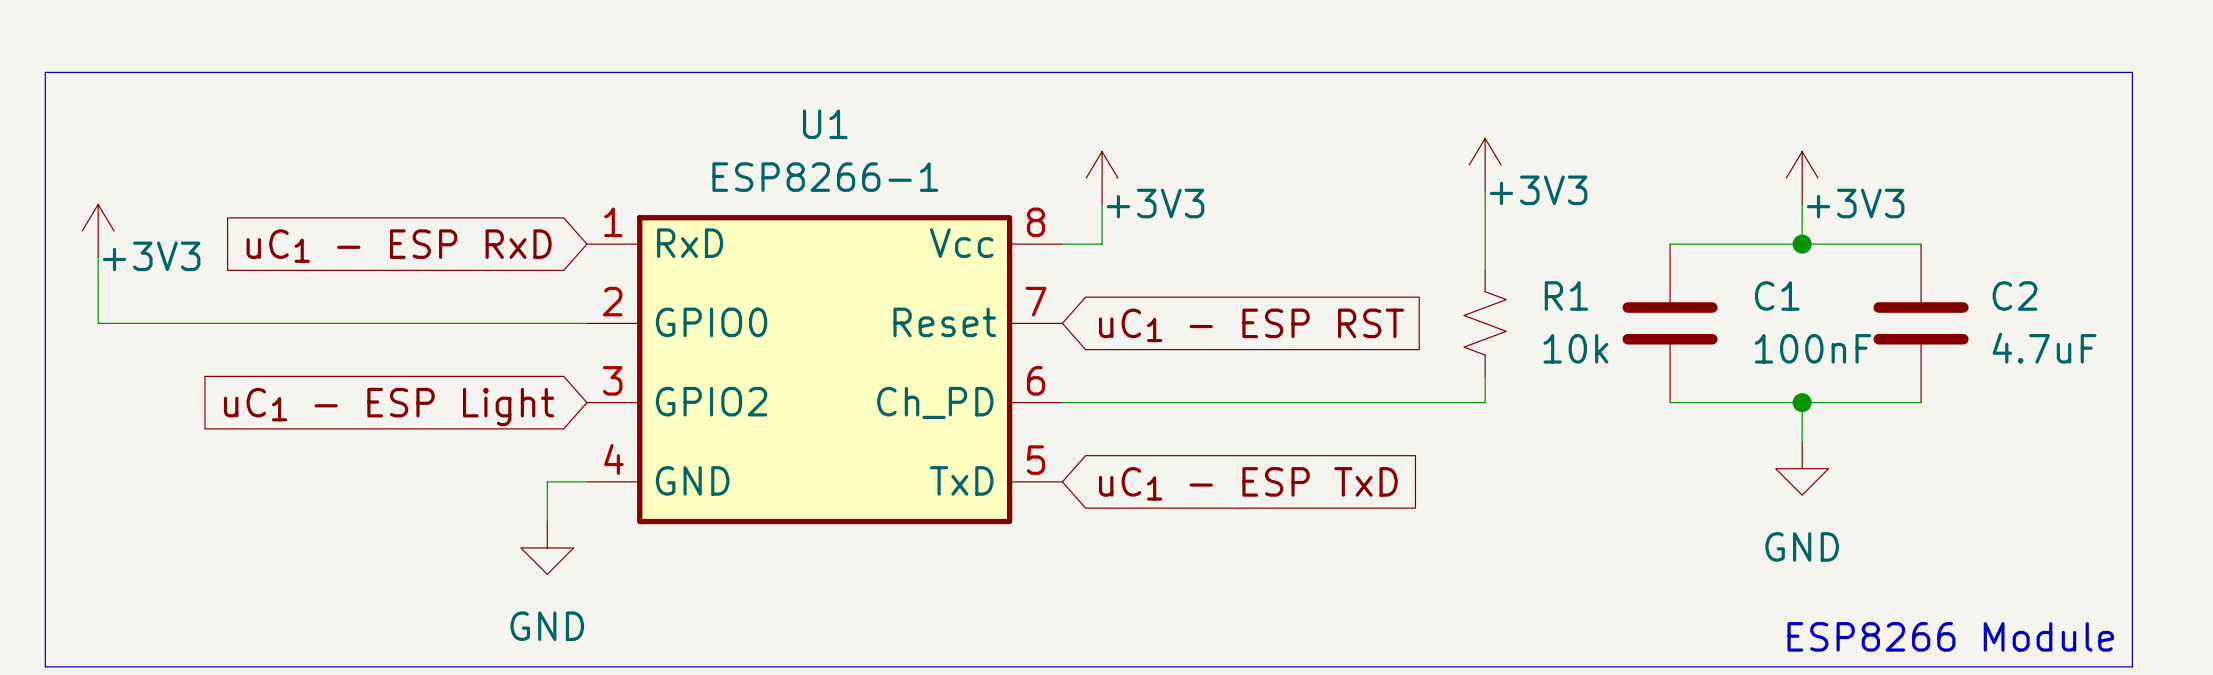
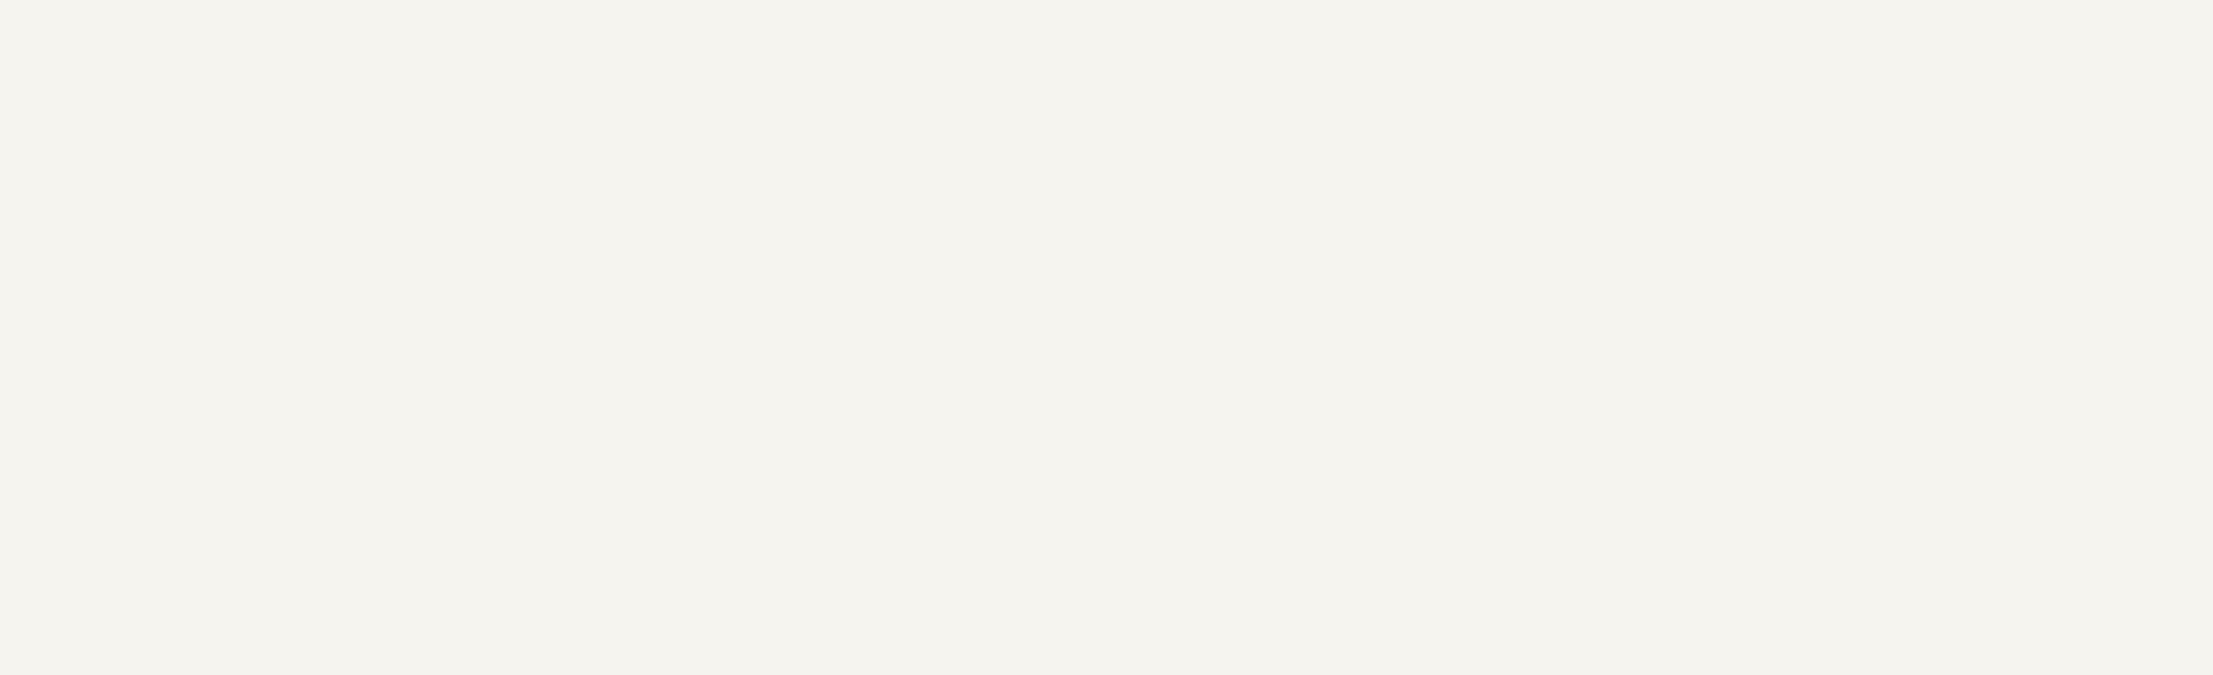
line: (45, 72) (2132, 72) (2132, 666) (45, 666) (45, 72) -> none
power symbol: +3V3 (1485, 164) -> none
power symbol: +3V3 (1102, 178) -> none
power symbol: +3V3 (1802, 178) -> none
wire: (1485, 191) (1485, 270) -> none
wire: (1102, 204) (1102, 244) (1062, 244) -> none
wire: (1802, 204) (1802, 244) -> none
power symbol: +3V3 (98, 230) -> none
wire: (1670, 244) (1921, 244) -> none
junction: (1802, 244) -> none
global label: uC1 - ESP RxD (399, 246) -> none
wire: (98, 257) (98, 323) (586, 323) -> none
R1: 10k (1485, 323) -> none
C1: 100nF (1670, 323) -> none
C2: 4.7uF (1921, 323) -> none
global label: uC1 - ESP RST (1251, 325) -> none
U1: ESP8266-1 (824, 369) -> none
wire: (1485, 376) (1485, 402) (1062, 402) -> none
wire: (1670, 402) (1921, 402) -> none
wire: (1802, 402) (1802, 442) -> none
junction: (1802, 402) -> none
global label: uC1 - ESP Light (389, 407) -> none
power symbol: GND (1802, 468) -> none
wire: (586, 481) (547, 481) (547, 521) -> none
global label: uC1 - ESP TxD (1248, 483) -> none
power symbol: GND (547, 547) -> none
text: ESP8266 Module (1950, 636) -> none

